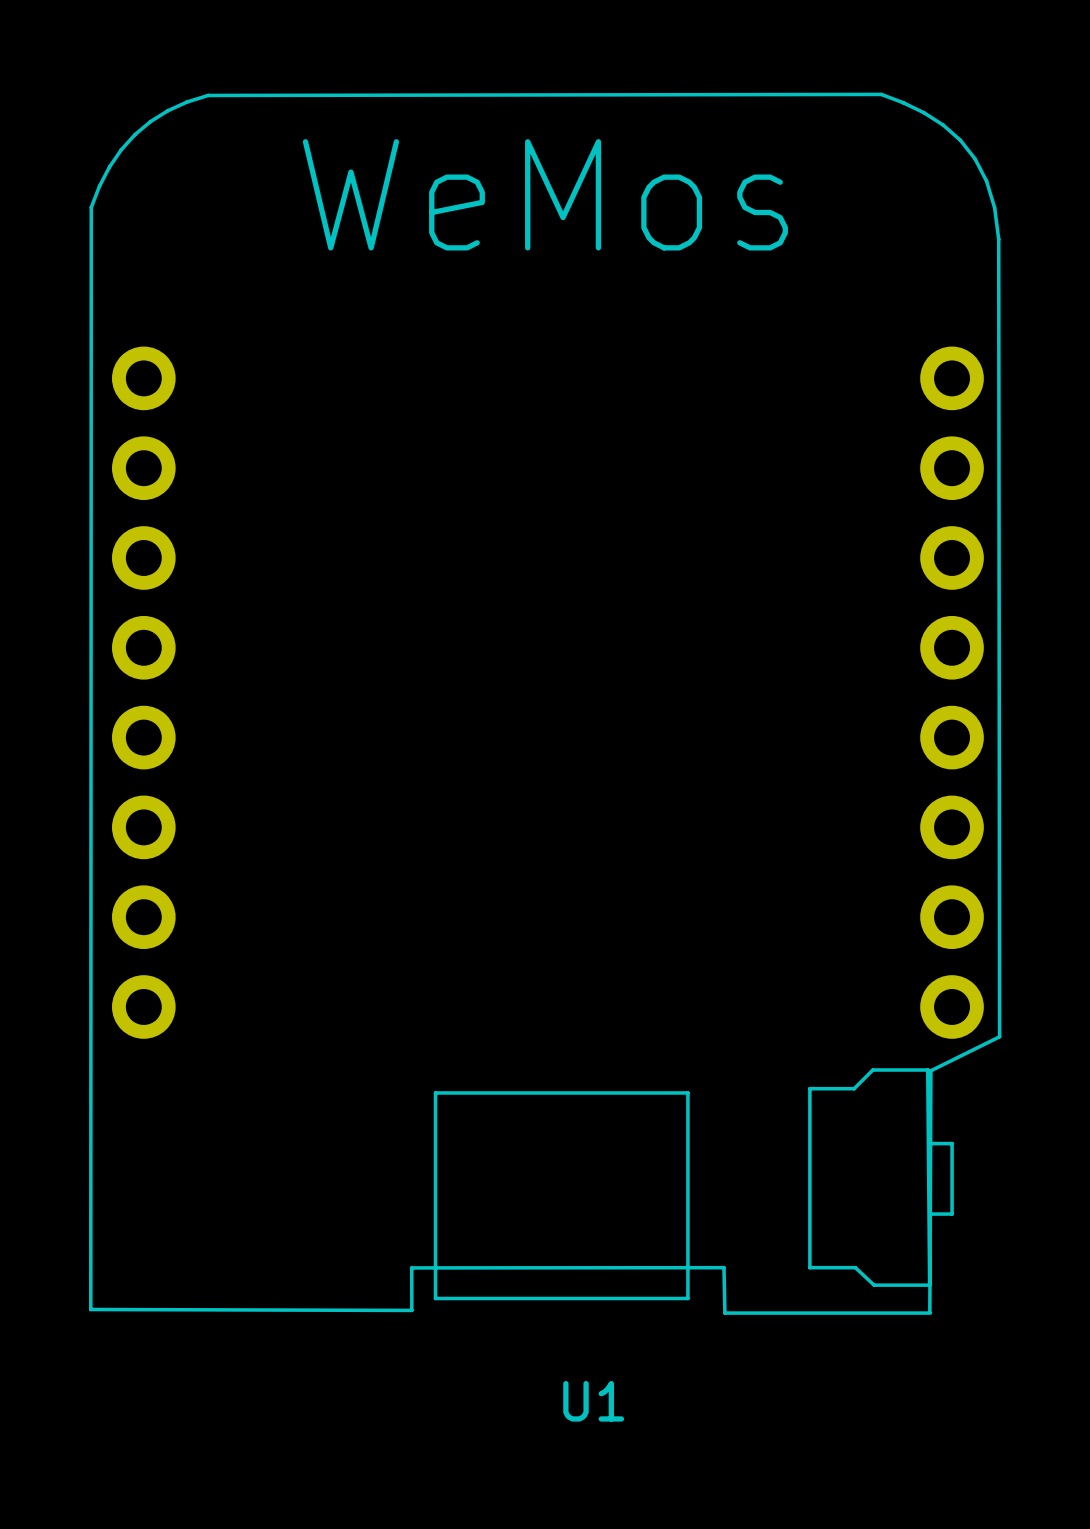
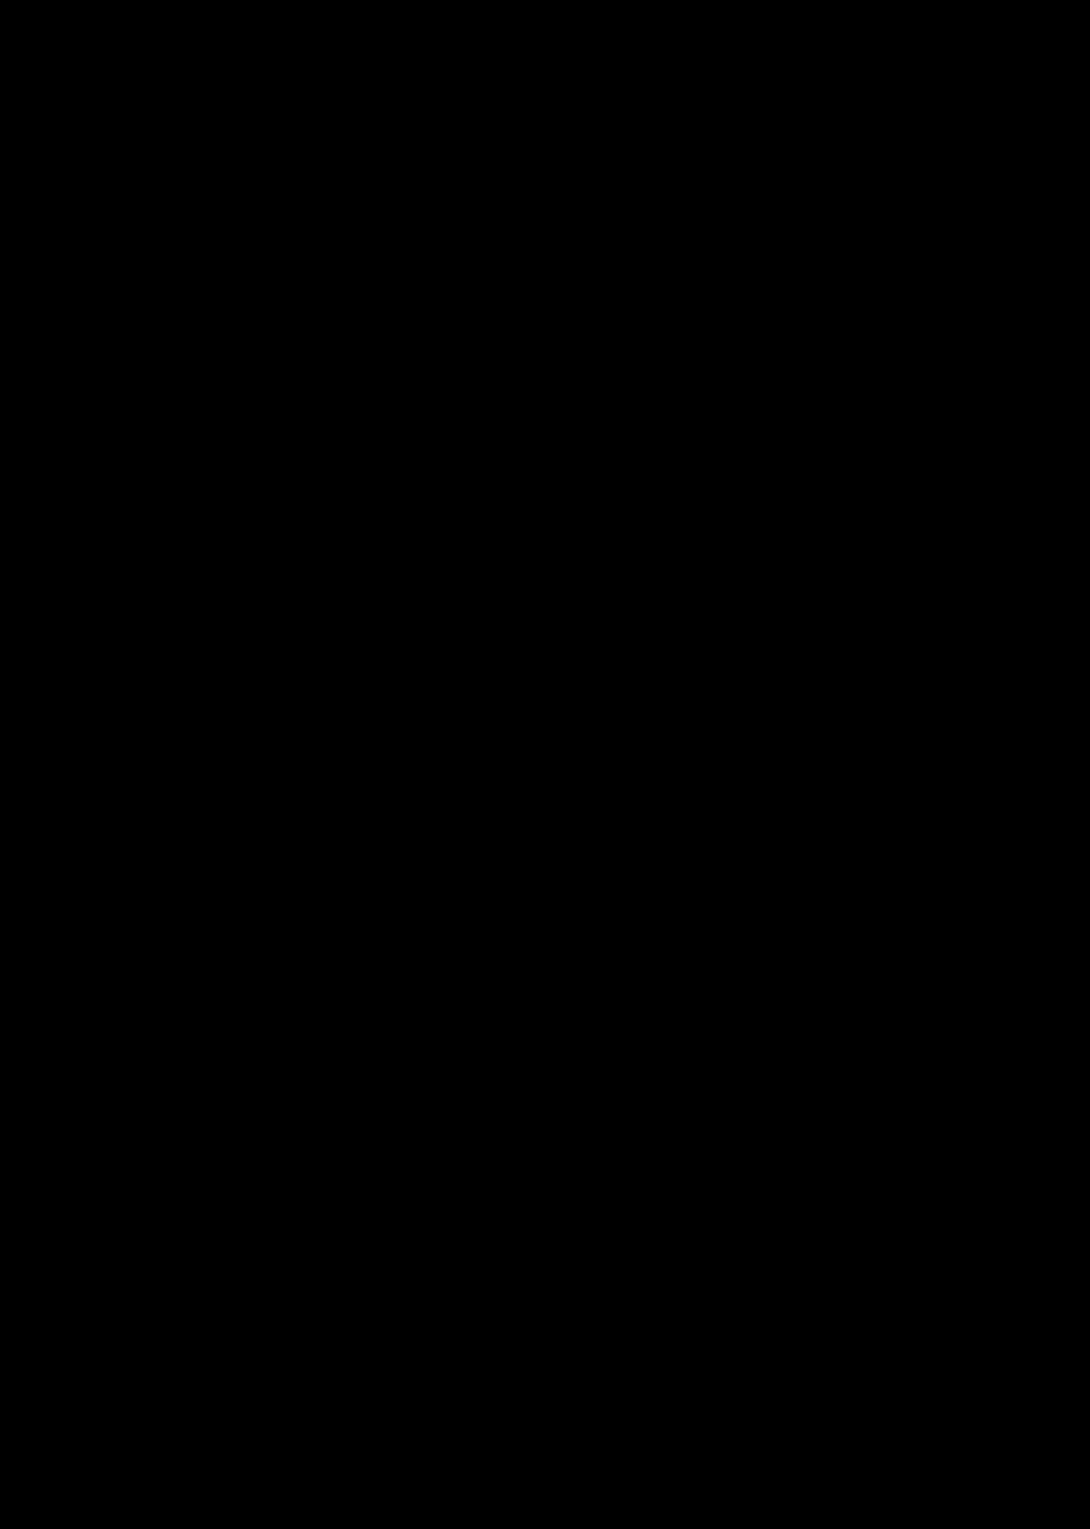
U1: (545, 703) -> none

